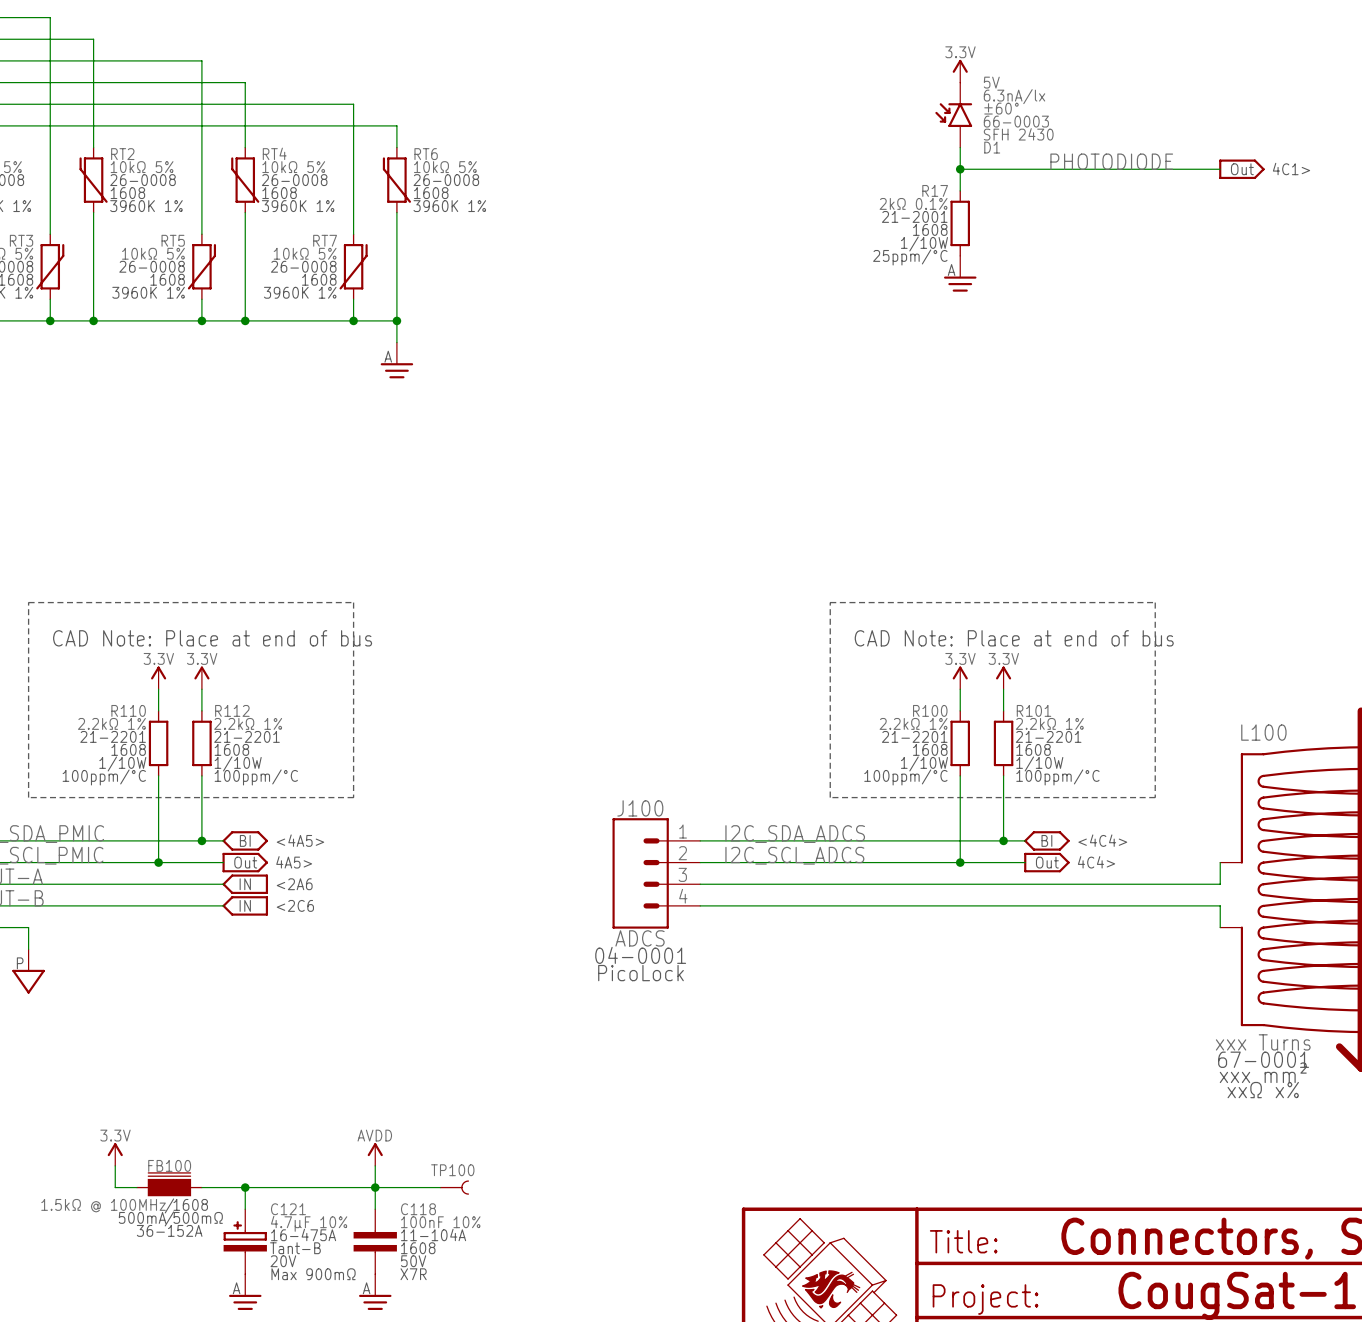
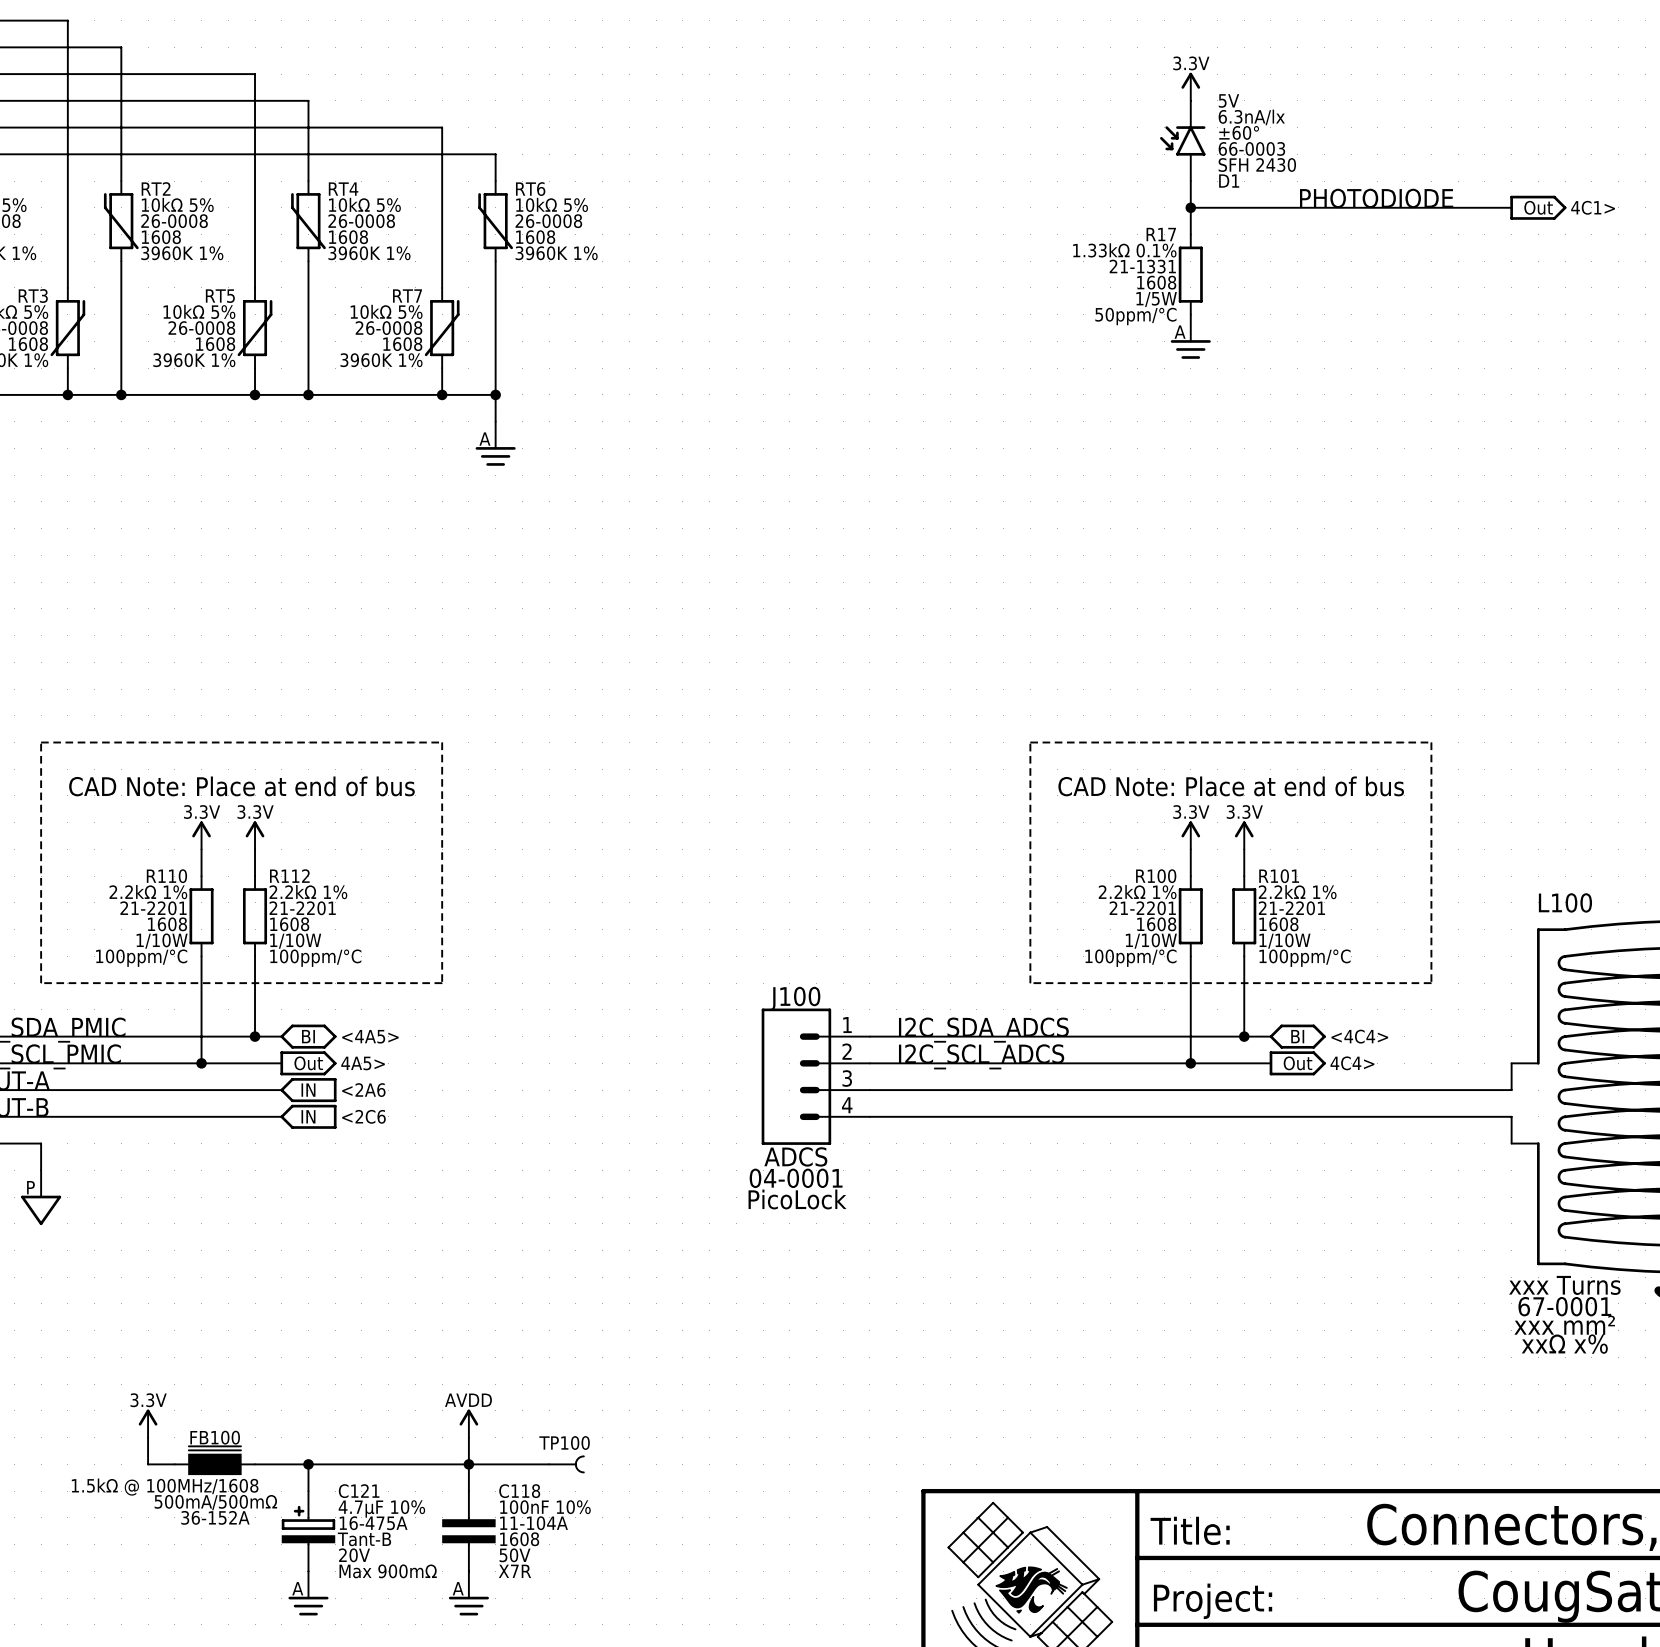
R17 value: 2kΩ 0.1% (913, 203) -> 1.33kΩ 0.1% (1124, 250)
R17 text: 21-2001 (914, 216) -> 21-1331 (1142, 266)
R17 text: 1/10W (924, 243) -> 1/5W (1156, 299)
R17 text: 25ppm/°C (910, 257) -> 50ppm/°C (1135, 316)

